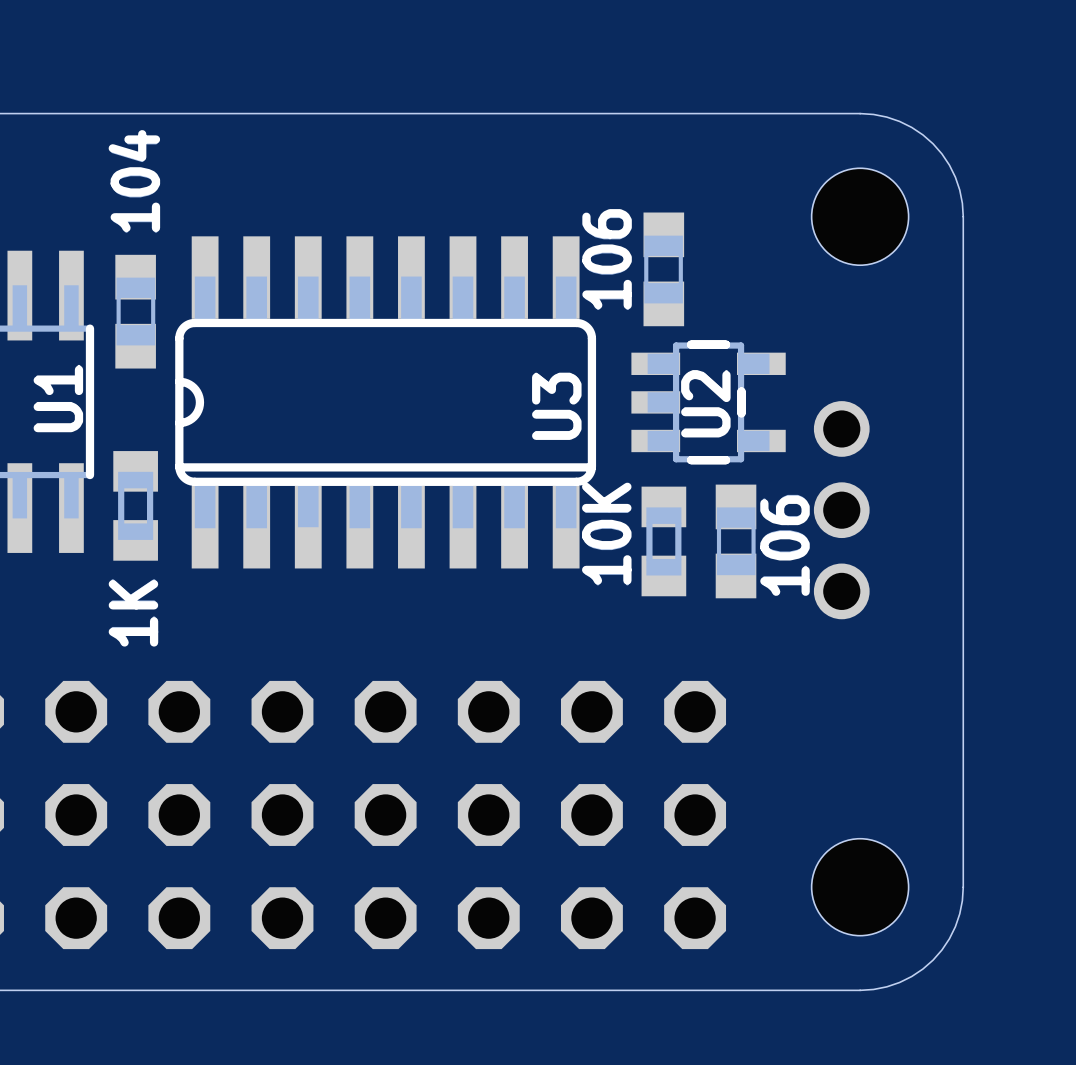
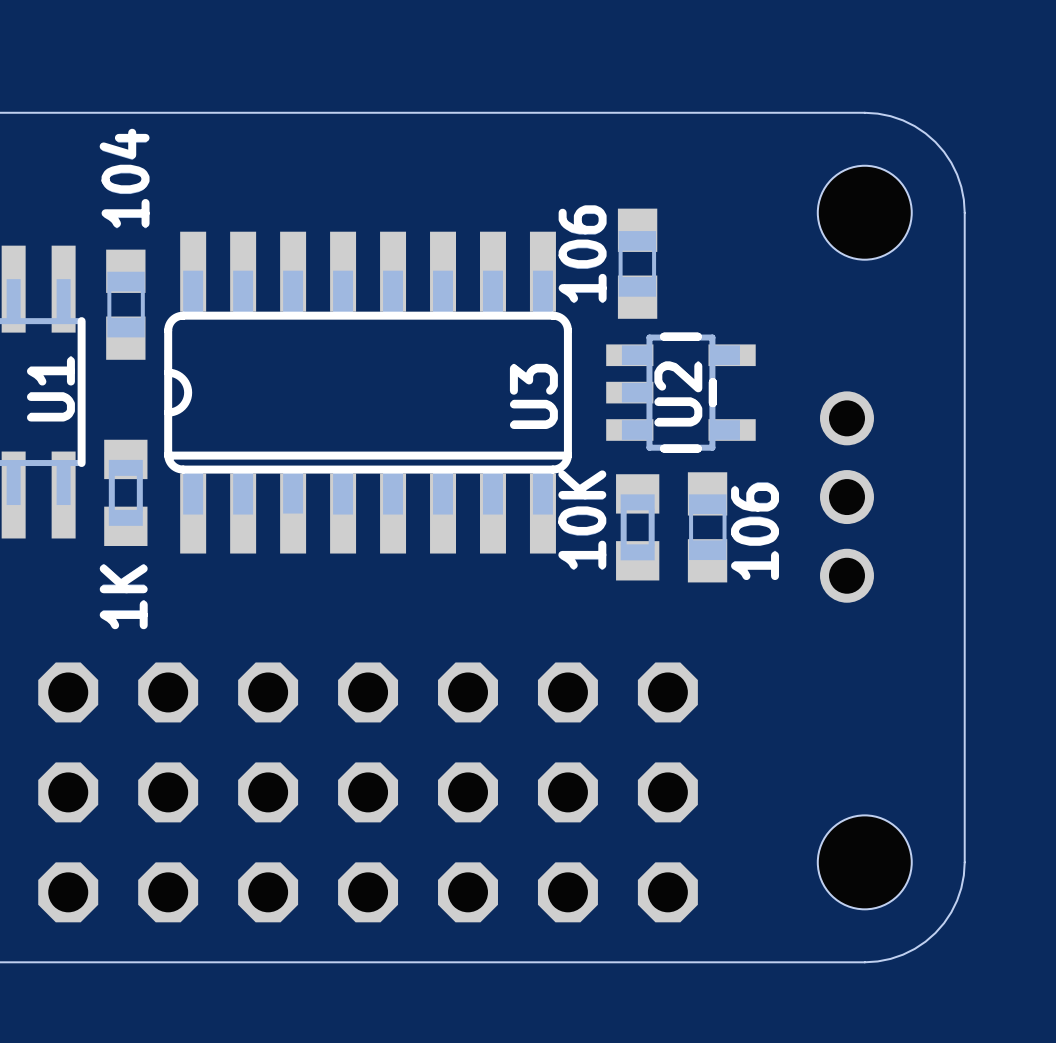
board edge: (860, 113) (886, 117) (899, 121) (922, 134) (933, 143) (941, 153) (955, 177) (959, 190) (963, 216) (962, 900) (955, 926) (941, 950) (933, 960) (922, 969) (899, 982) (886, 986) (860, 990) -> (827, 112) (864, 112) (890, 116) (903, 120) (925, 133) (944, 151) (957, 174) (961, 186) (964, 212) (963, 875) (957, 900) (944, 923) (935, 933) (914, 948) (890, 958) (877, 961) (827, 962)
hole position: (860, 216) -> (864, 212)
part position: (841, 510) -> (846, 497)
hole position: (860, 887) -> (864, 862)

